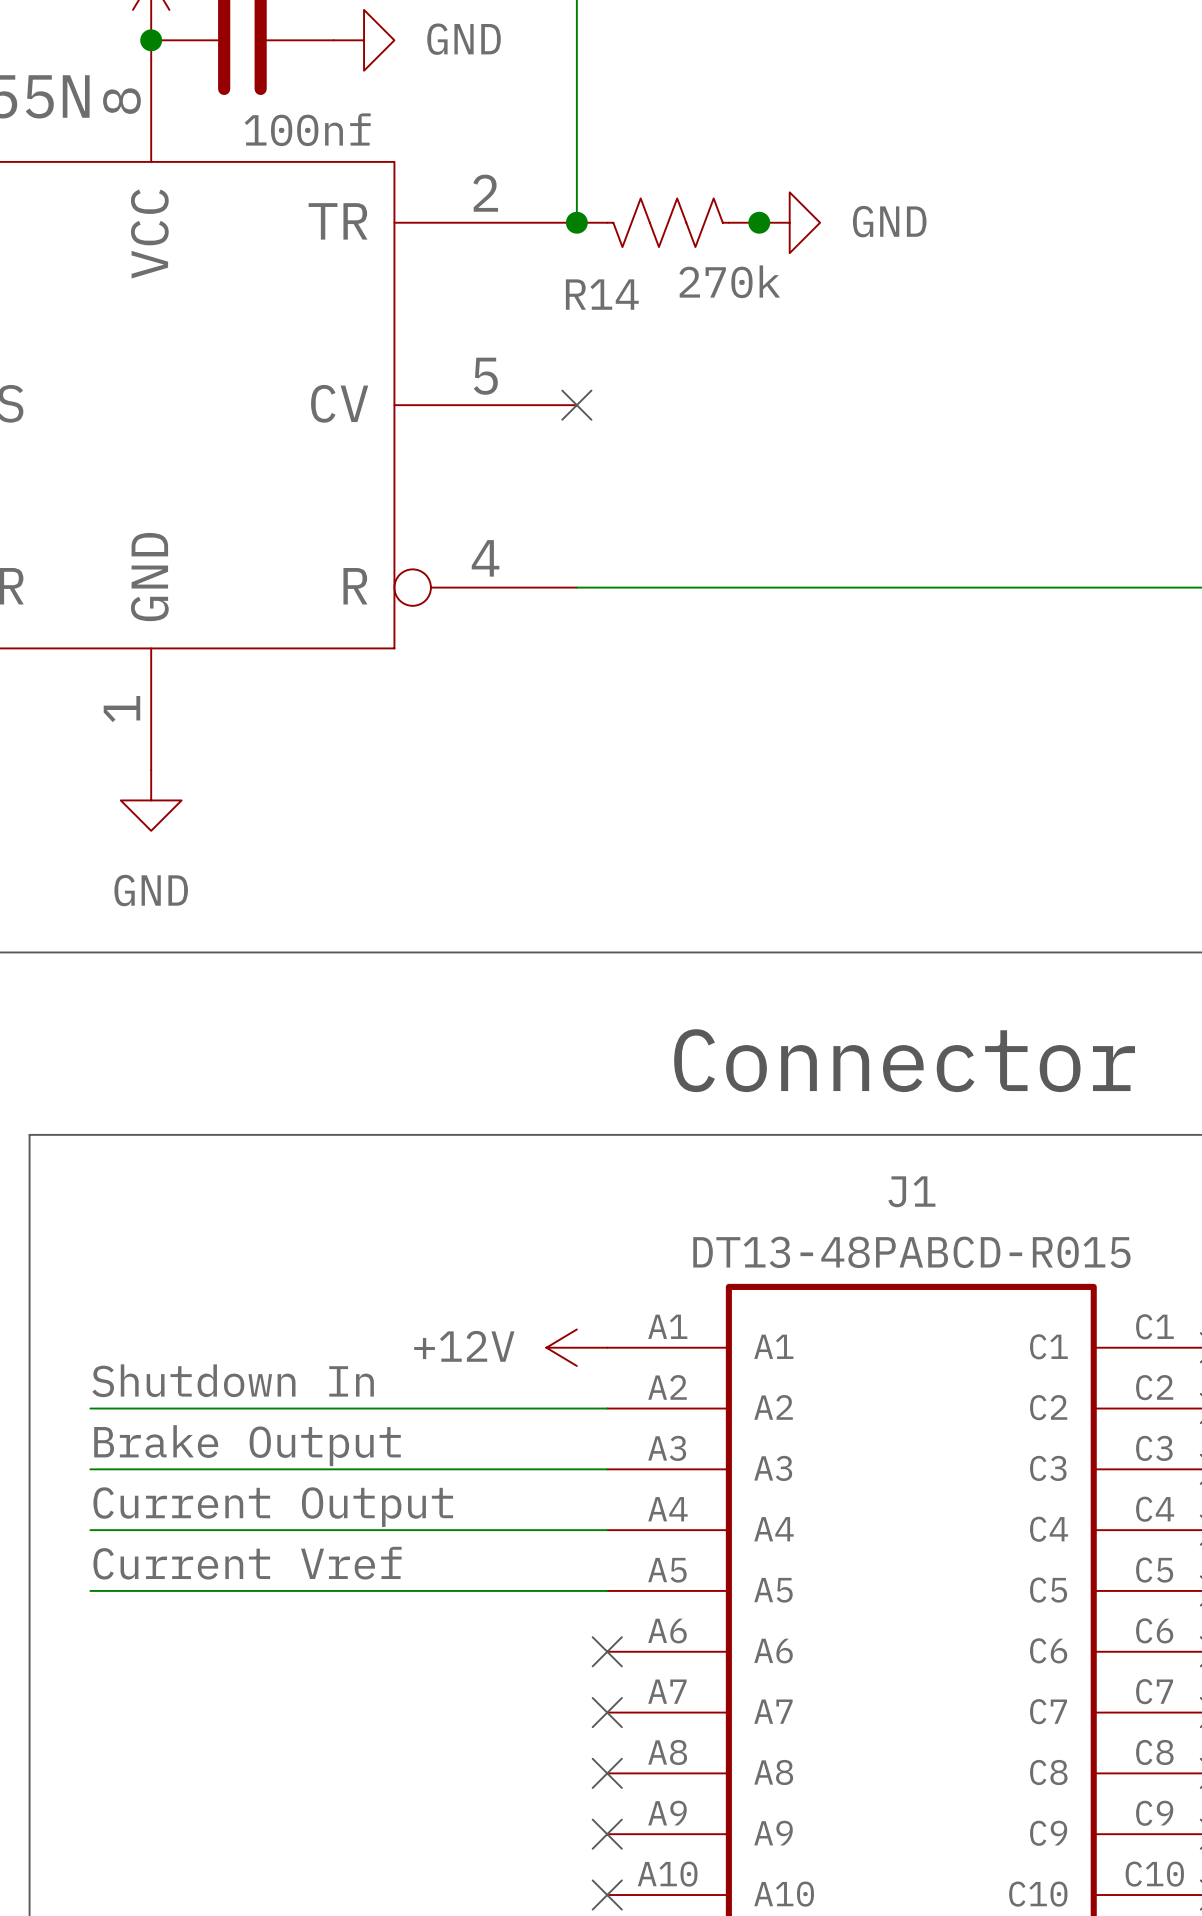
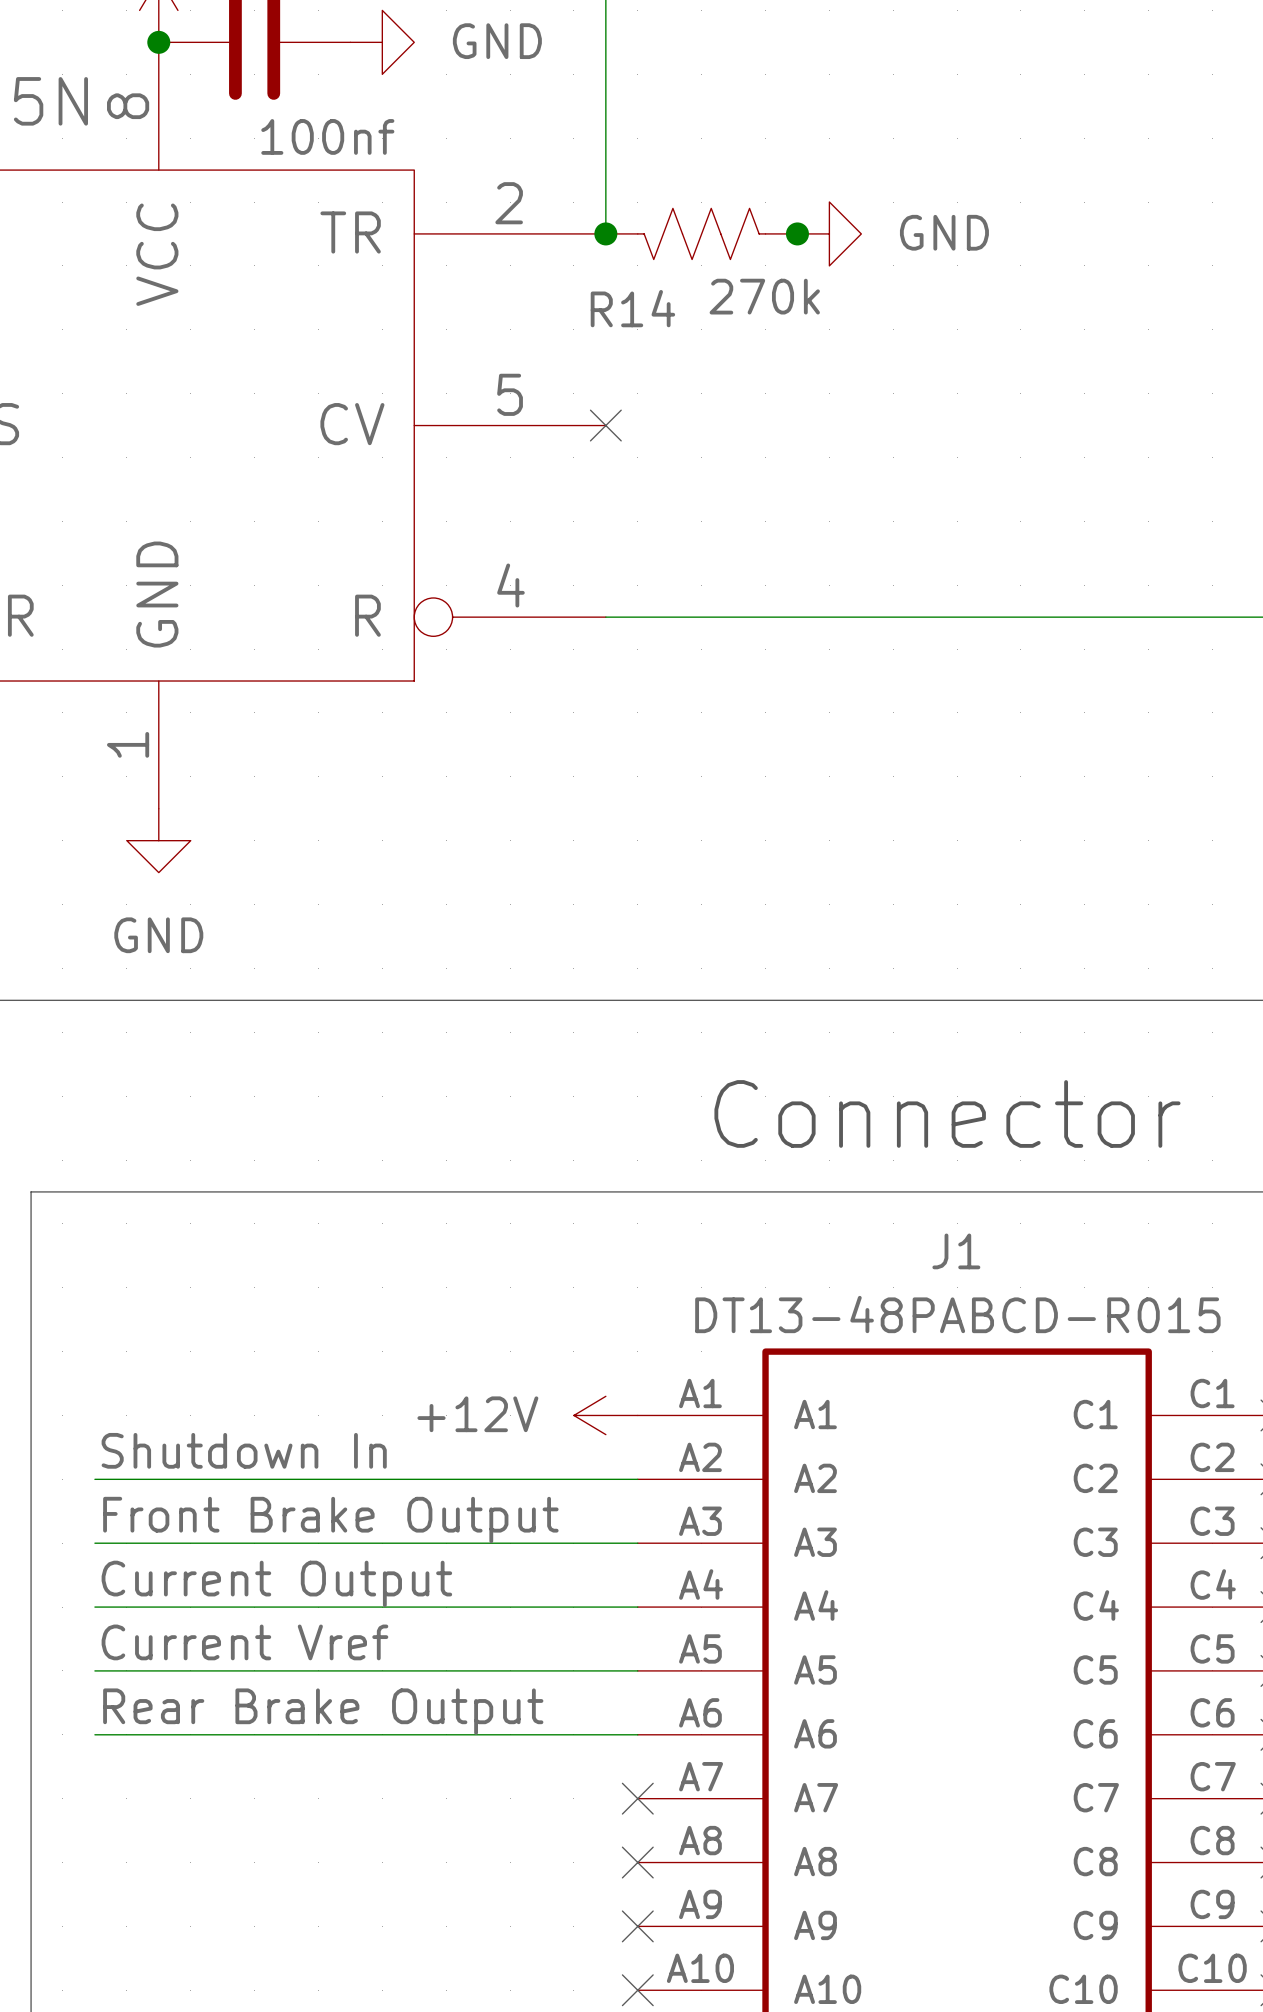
label: Brake Output (247, 1445) -> Front Brake Output (330, 1520)
label: none -> Rear Brake Output (323, 1711)
wire: none -> (94, 1734) (637, 1734)
no-connect mark: (607, 1651) -> none

